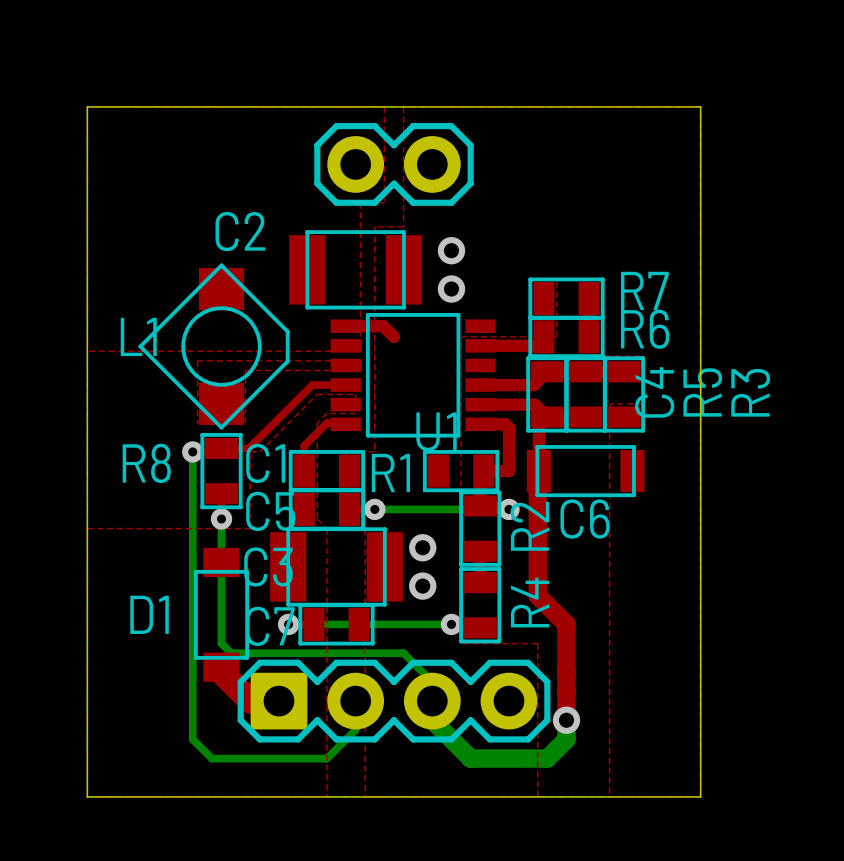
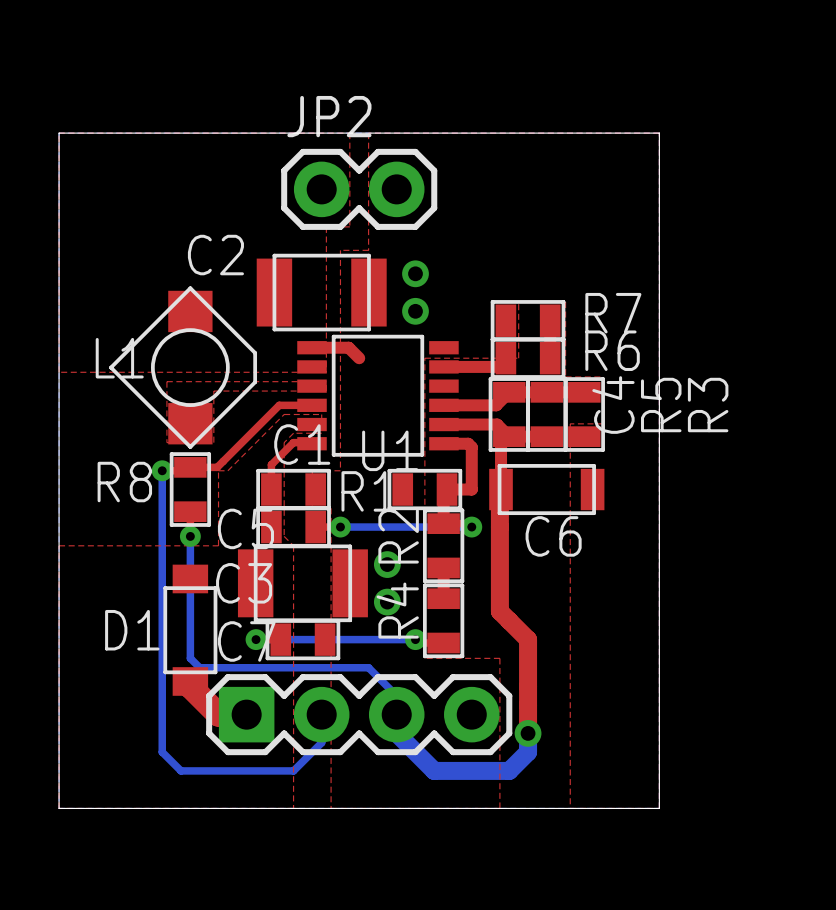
JP2 name: none -> JP2 (329, 116)
C1 name position: C1 (265, 463) -> C1 (302, 444)
R2 name position: R2 (529, 526) -> R2 (398, 536)
R4 name position: R4 (530, 602) -> R4 (397, 610)

